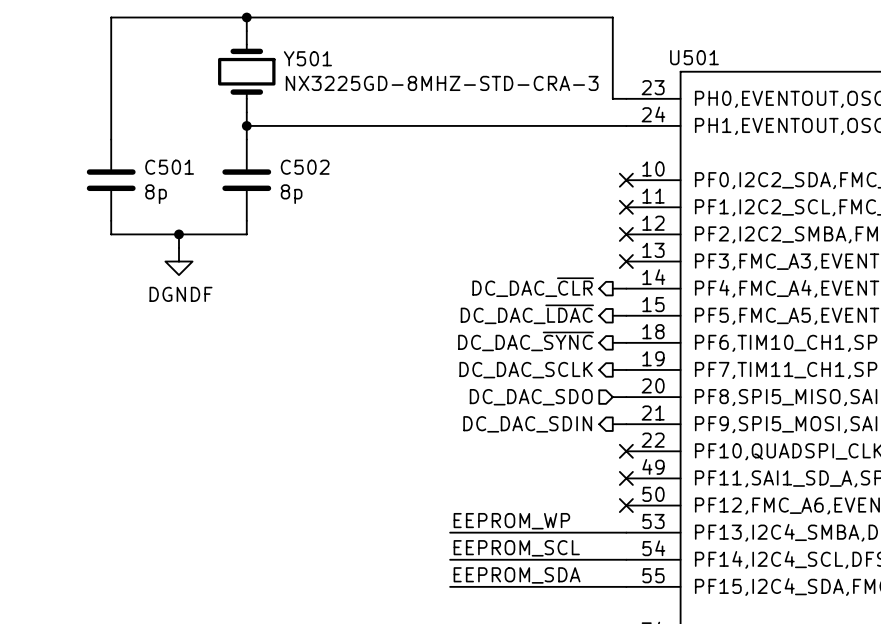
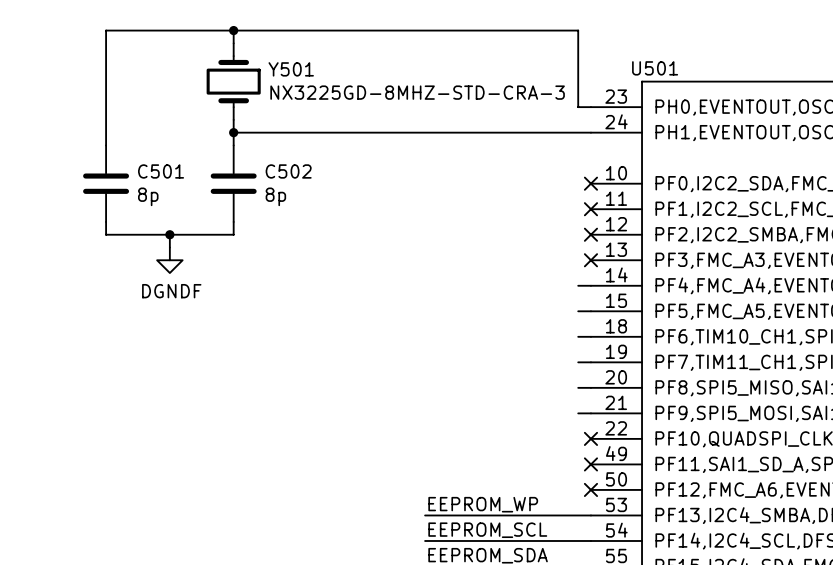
hierarchical label: DC_DAC_~{CLR} (533, 287) -> none
hierarchical label: DC_DAC_~{LDAC} (527, 314) -> none
hierarchical label: DC_DAC_~{SYNC} (526, 341) -> none
hierarchical label: DC_DAC_SCLK (526, 370) -> none
hierarchical label: DC_DAC_SDO (531, 397) -> none
hierarchical label: DC_DAC_SDIN (527, 424) -> none

